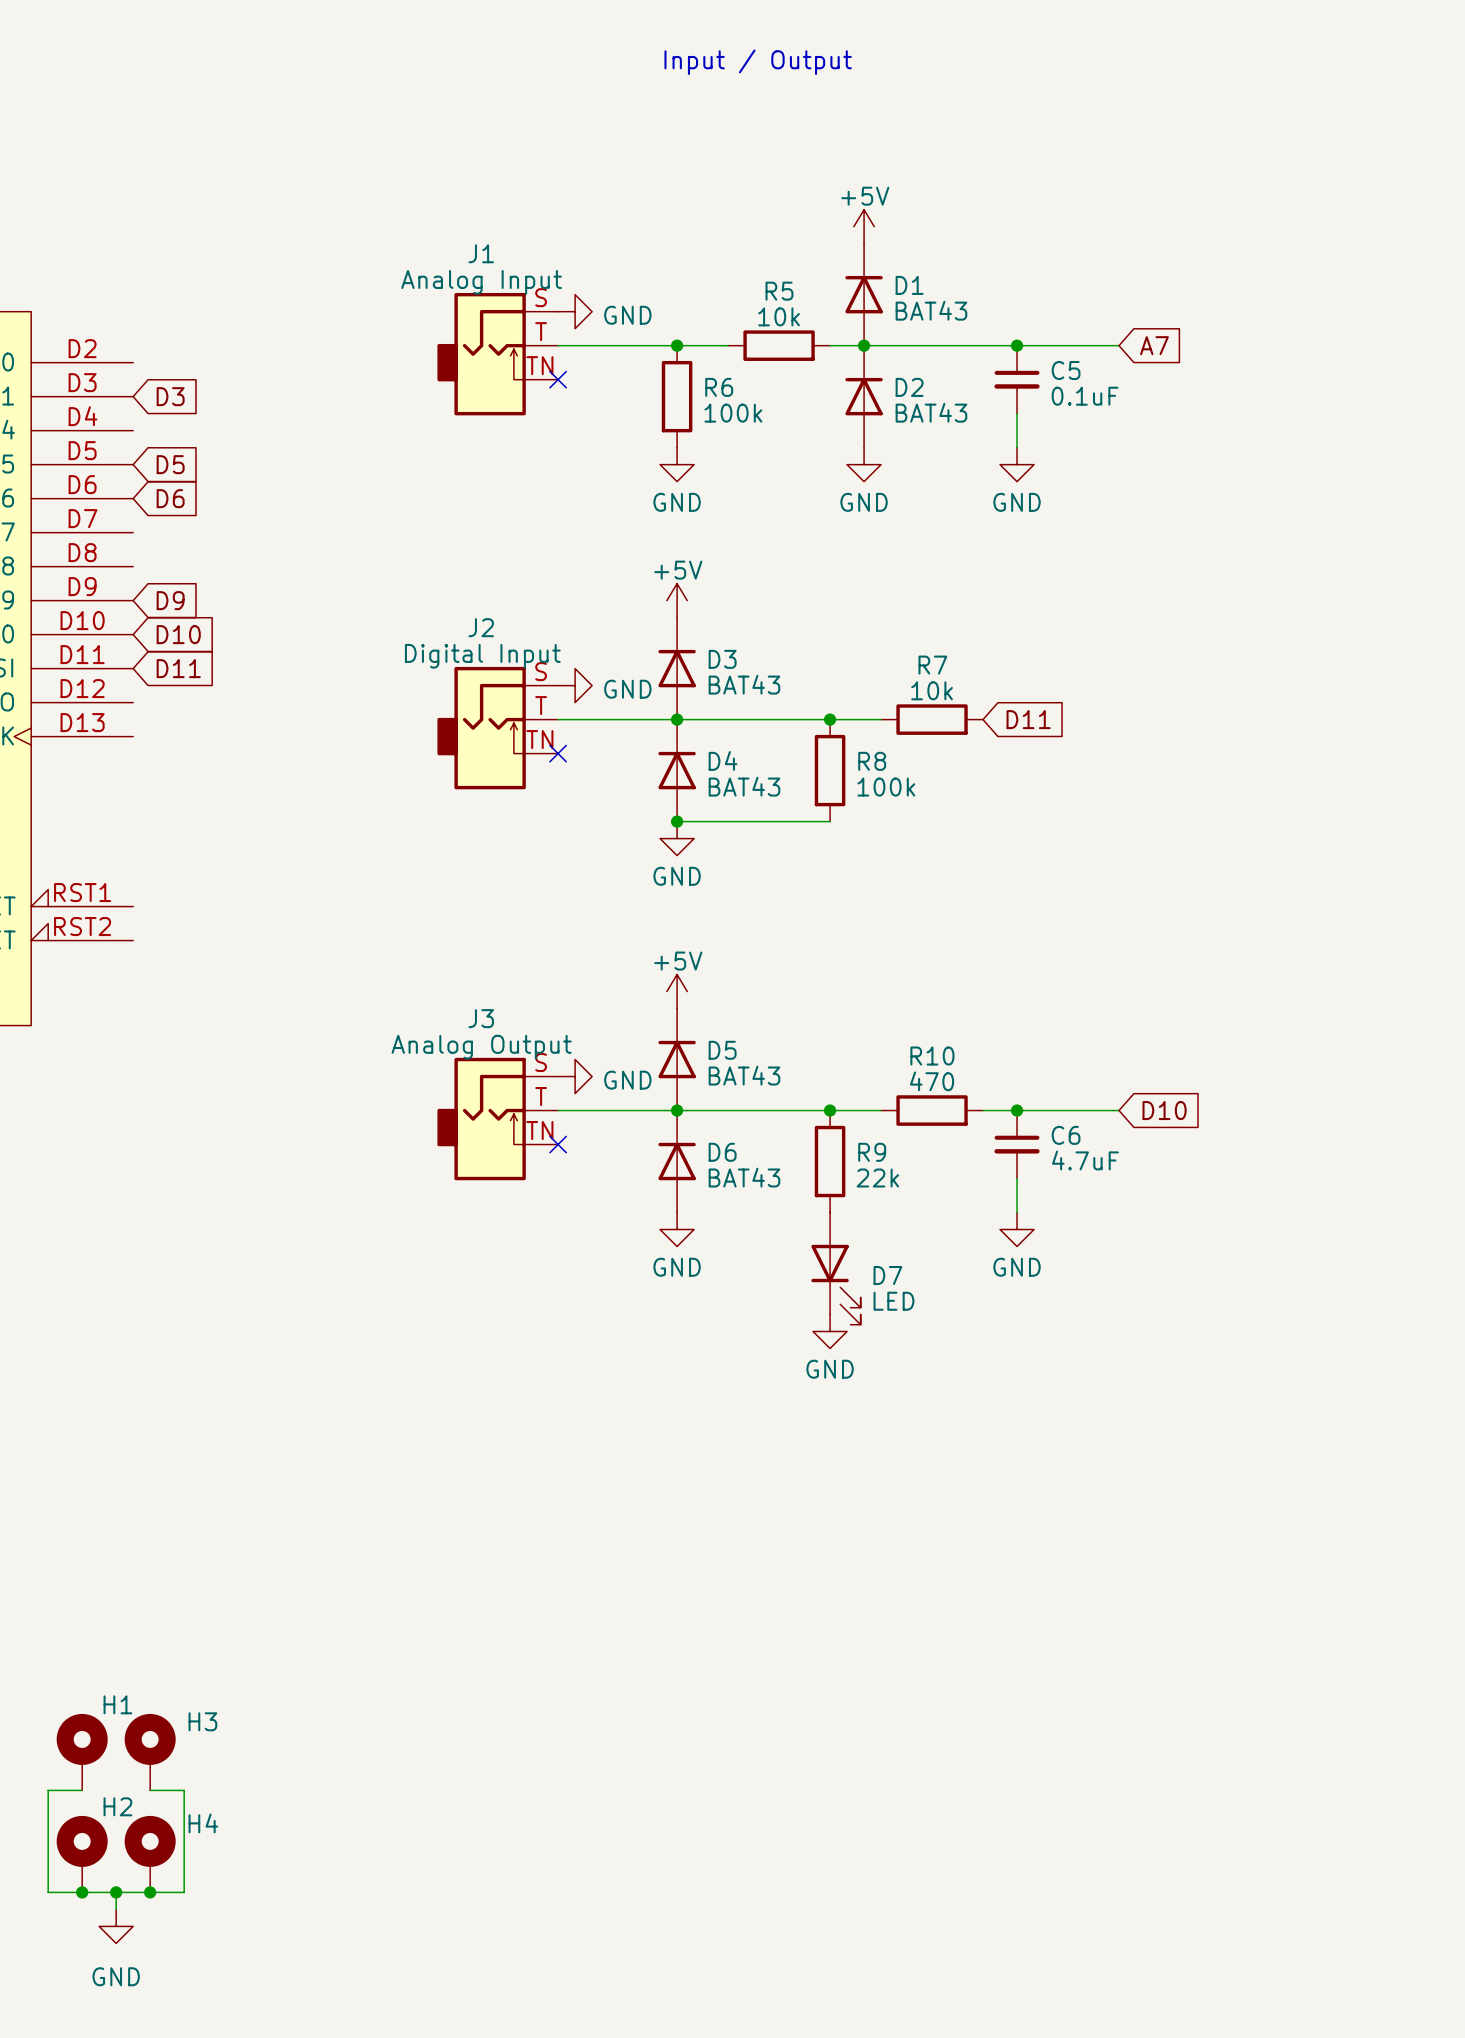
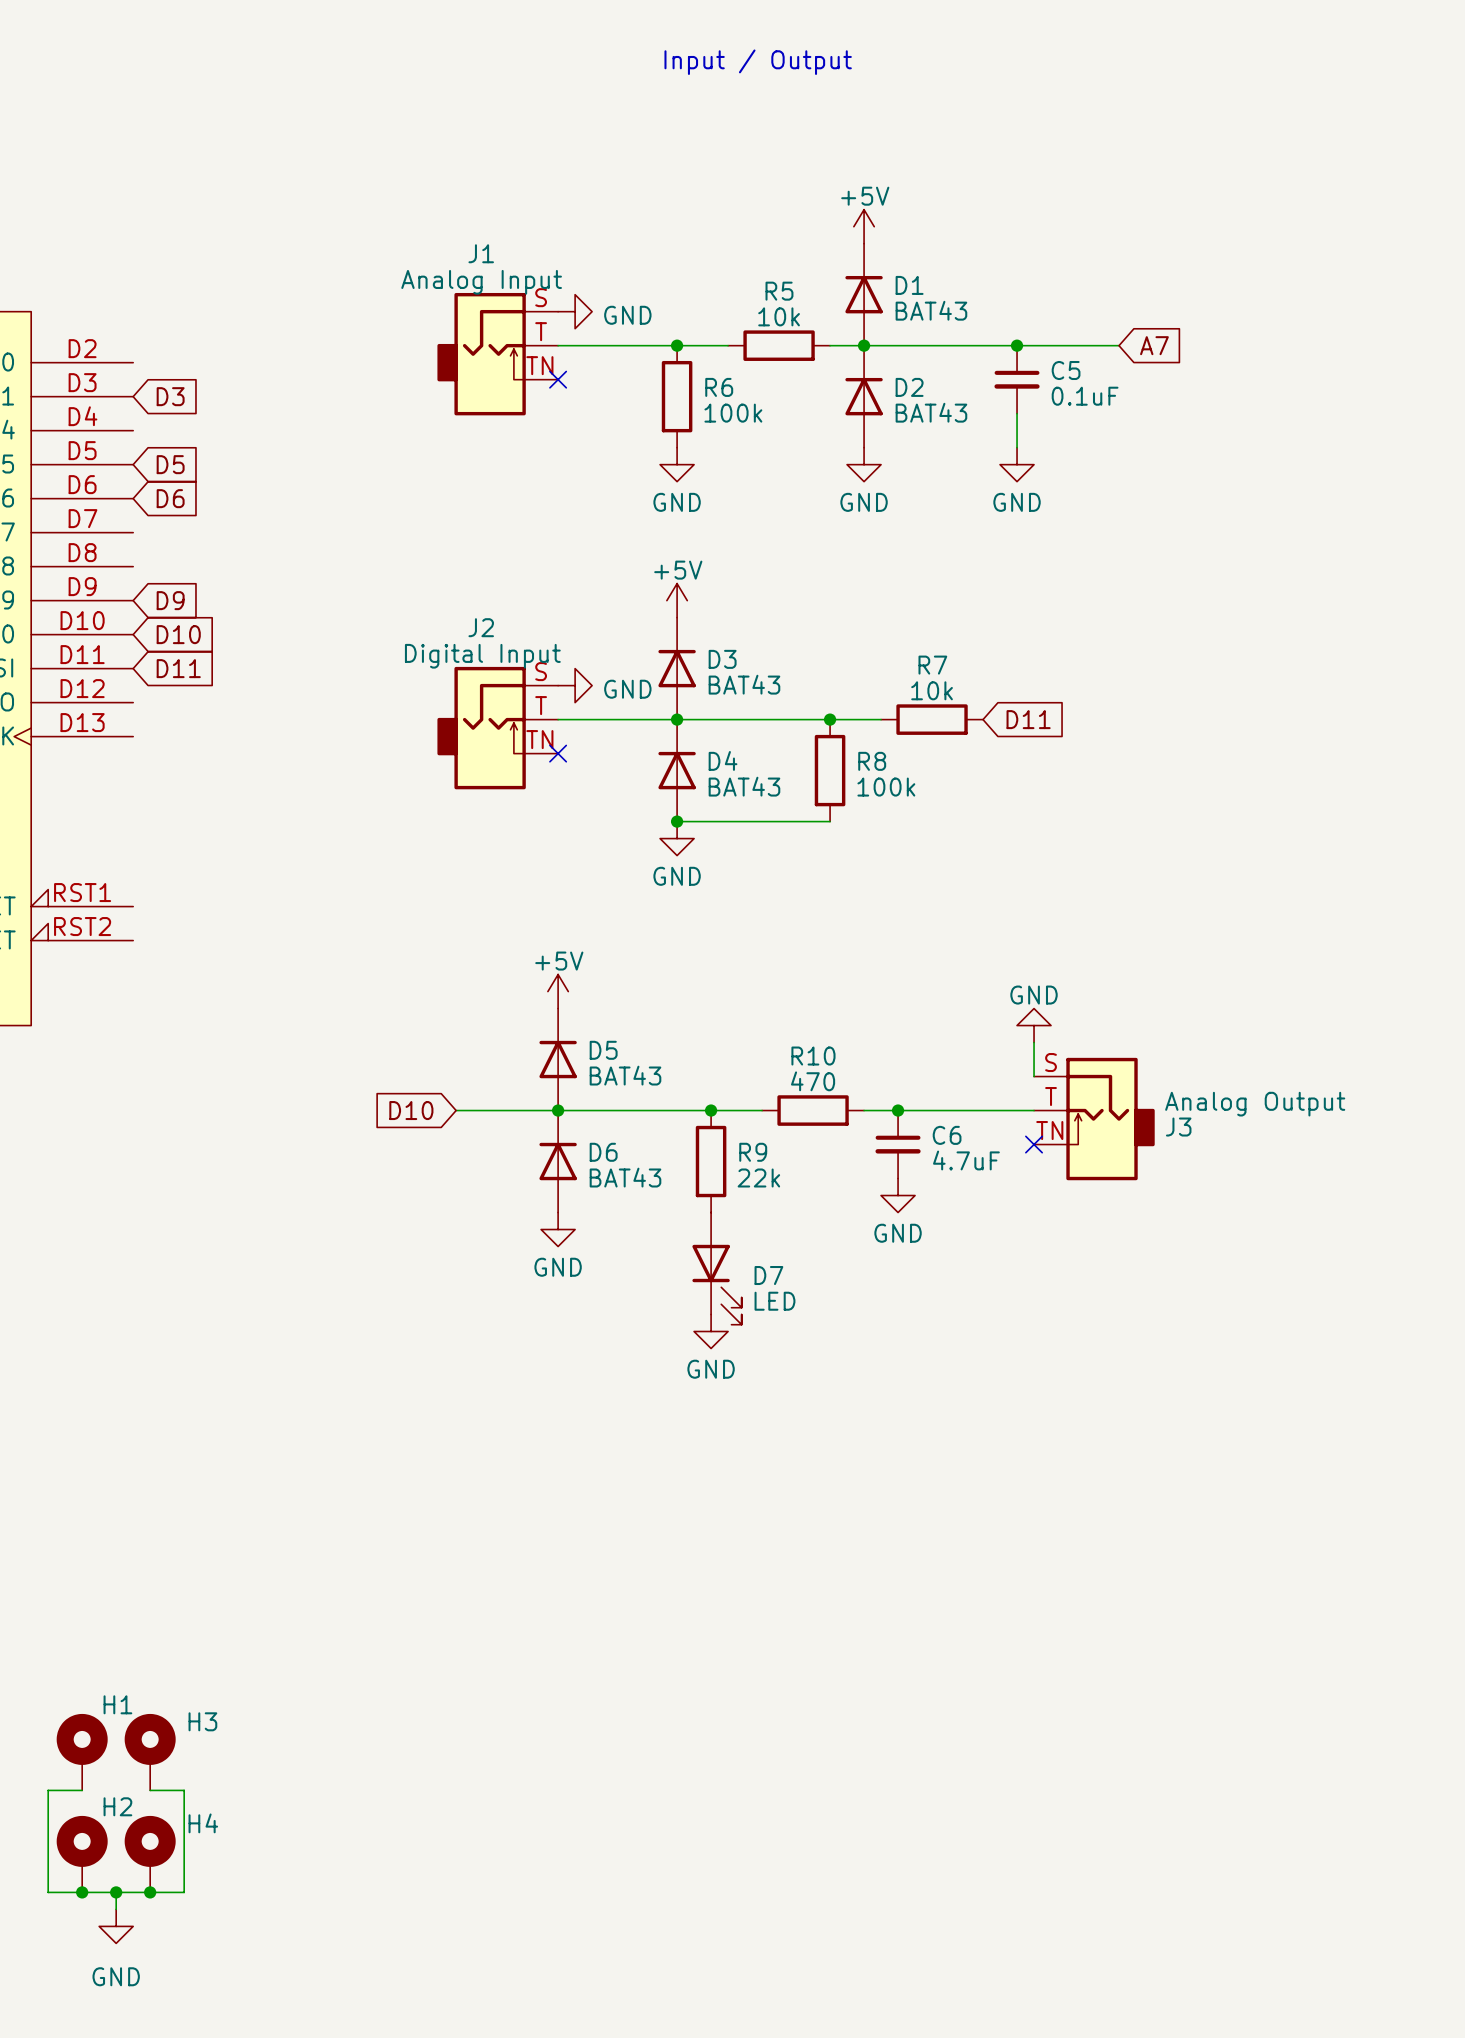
power symbol position: +5V (677, 991) -> +5V (558, 991)
J3 name position: J3 (481, 1018) -> J3 (1178, 1127)
power symbol: none -> GND (1034, 1025)
J3 value position: Analog Output (481, 1047) -> Analog Output (1255, 1104)
D5 position: (677, 1059) -> (558, 1059)
power symbol: GND (575, 1076) -> none
global label: none -> D10 (411, 1110)
junction: none -> (558, 1110)
junction position: (677, 1110) -> (711, 1110)
wire: (762, 1110) (864, 1110) -> (881, 1110) (983, 1110)
junction: (830, 1110) -> none
junction: none -> (898, 1110)
R10 position: (932, 1110) -> (813, 1110)
junction: (1017, 1110) -> none
global label: D10 (1164, 1110) -> none
J3 flip: as is (481, 1119) -> left-right (1110, 1119)
J3 position: (497, 1119) -> (1094, 1119)
no-connect mark: (558, 1144) -> none
C6 position: (1017, 1144) -> (898, 1144)
no-connect mark: none -> (1034, 1144)
D6 position: (677, 1161) -> (558, 1161)
R9 position: (830, 1161) -> (711, 1161)
wire: (1017, 1178) (1017, 1212) -> (1034, 1042) (1034, 1076)
power symbol: none -> GND (898, 1195)
power symbol: none -> GND (558, 1229)
power symbol: GND (677, 1229) -> none
power symbol: GND (1017, 1229) -> none
D7 position: (836, 1268) -> (717, 1268)
power symbol: none -> GND (711, 1331)
power symbol: GND (830, 1331) -> none

